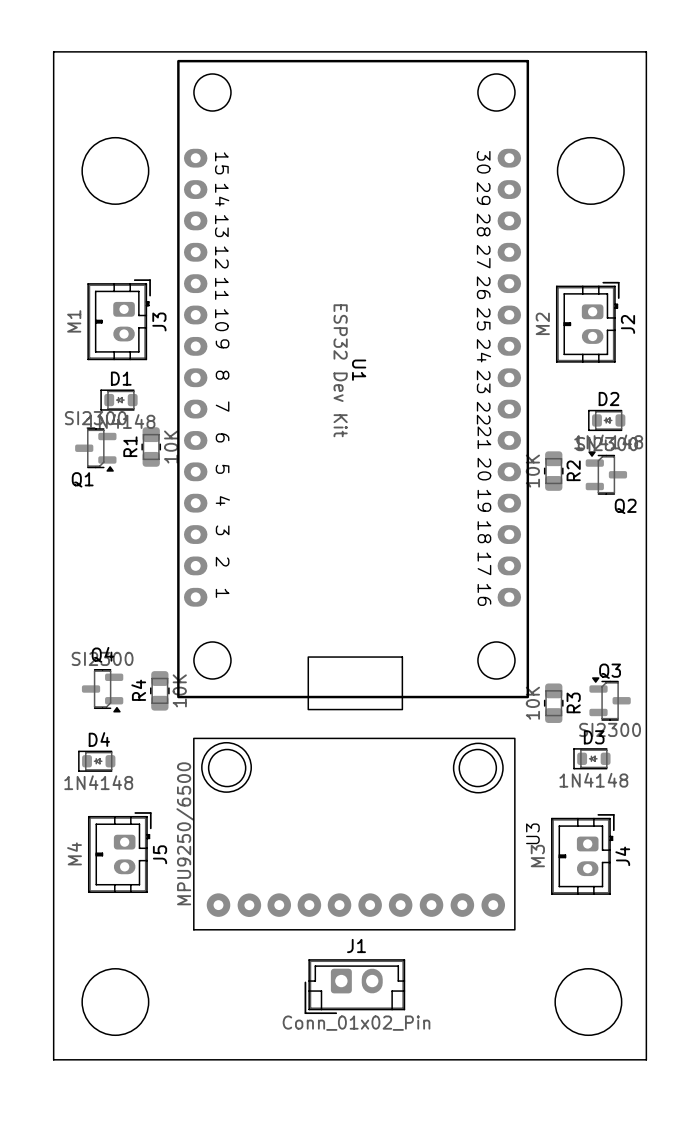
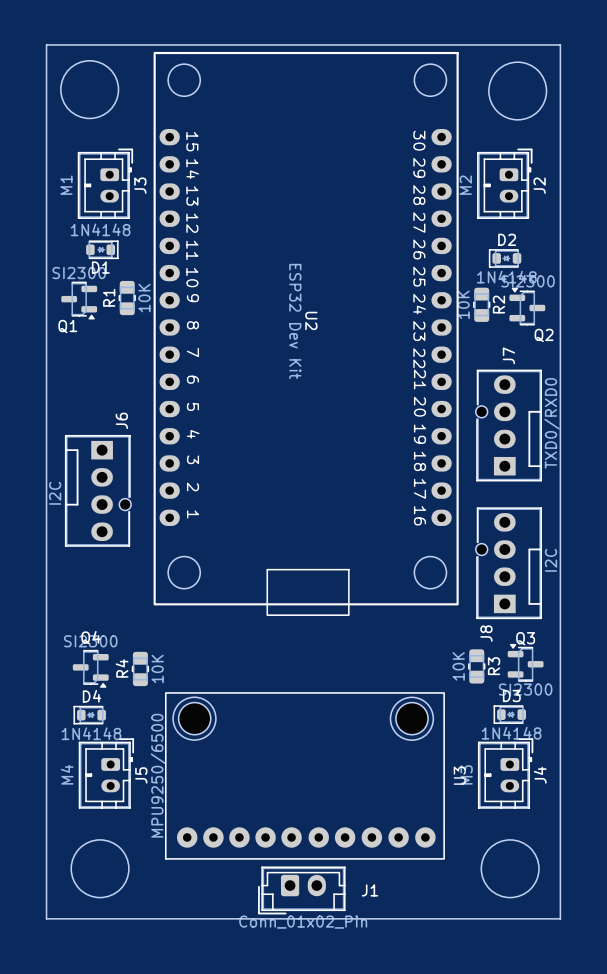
round board edge position: (115, 170) -> (89, 89)
round board edge position: (590, 170) -> (517, 91)
J3 position: (119, 319) -> (105, 183)
J2 position: (587, 322) -> (504, 183)
U1 name: U1 (359, 370) -> U2 (311, 320)
D1 rotation: 0° (118, 400) -> 180° (102, 249)
D1 position: (118, 400) -> (102, 249)
D2 position: (606, 420) -> (505, 258)
R1 position: (151, 447) -> (127, 298)
Q1 position: (95, 449) -> (79, 300)
R2 position: (553, 471) -> (481, 304)
Q2 position: (606, 473) -> (527, 306)
J7: none -> TXD0/RXD0 (508, 425)
J6: none -> I2C (98, 490)
J8: none -> I2C (508, 563)
Q4 position: (102, 690) -> (90, 668)
R4 position: (159, 690) -> (140, 668)
Q3 position: (610, 699) -> (525, 662)
R3 position: (553, 703) -> (476, 666)
U3 footprint: [193, 737, 516, 931] -> [165, 692, 445, 860]
D3 position: (591, 758) -> (509, 714)
D4 position: (96, 761) -> (89, 715)
round board edge position: (226, 767) -> (194, 718)
round board edge position: (478, 768) -> (411, 718)
J5 position: (119, 852) -> (106, 773)
J4 position: (582, 854) -> (505, 773)
J1 name position: J1 (356, 946) -> J1 (370, 890)
J1 position: (354, 986) -> (301, 890)

